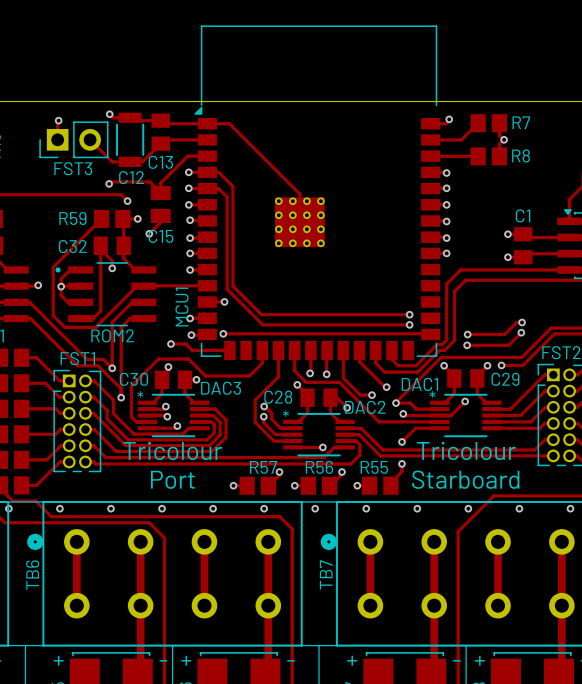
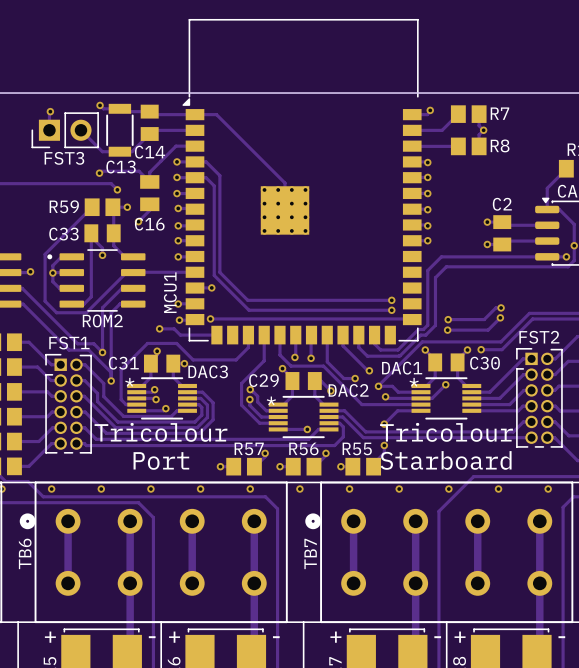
C13 name: C13 (160, 162) -> C14 (149, 152)
C12 name: C12 (131, 177) -> C13 (121, 167)
C1 name: C1 (523, 215) -> C2 (502, 204)
C15 name: C15 (160, 236) -> C16 (149, 224)
C32 name: C32 (72, 246) -> C33 (63, 234)
C30 name: C30 (133, 379) -> C31 (123, 363)
C29 name: C29 (505, 379) -> C30 (485, 363)
C28 name: C28 (278, 397) -> C29 (263, 380)

